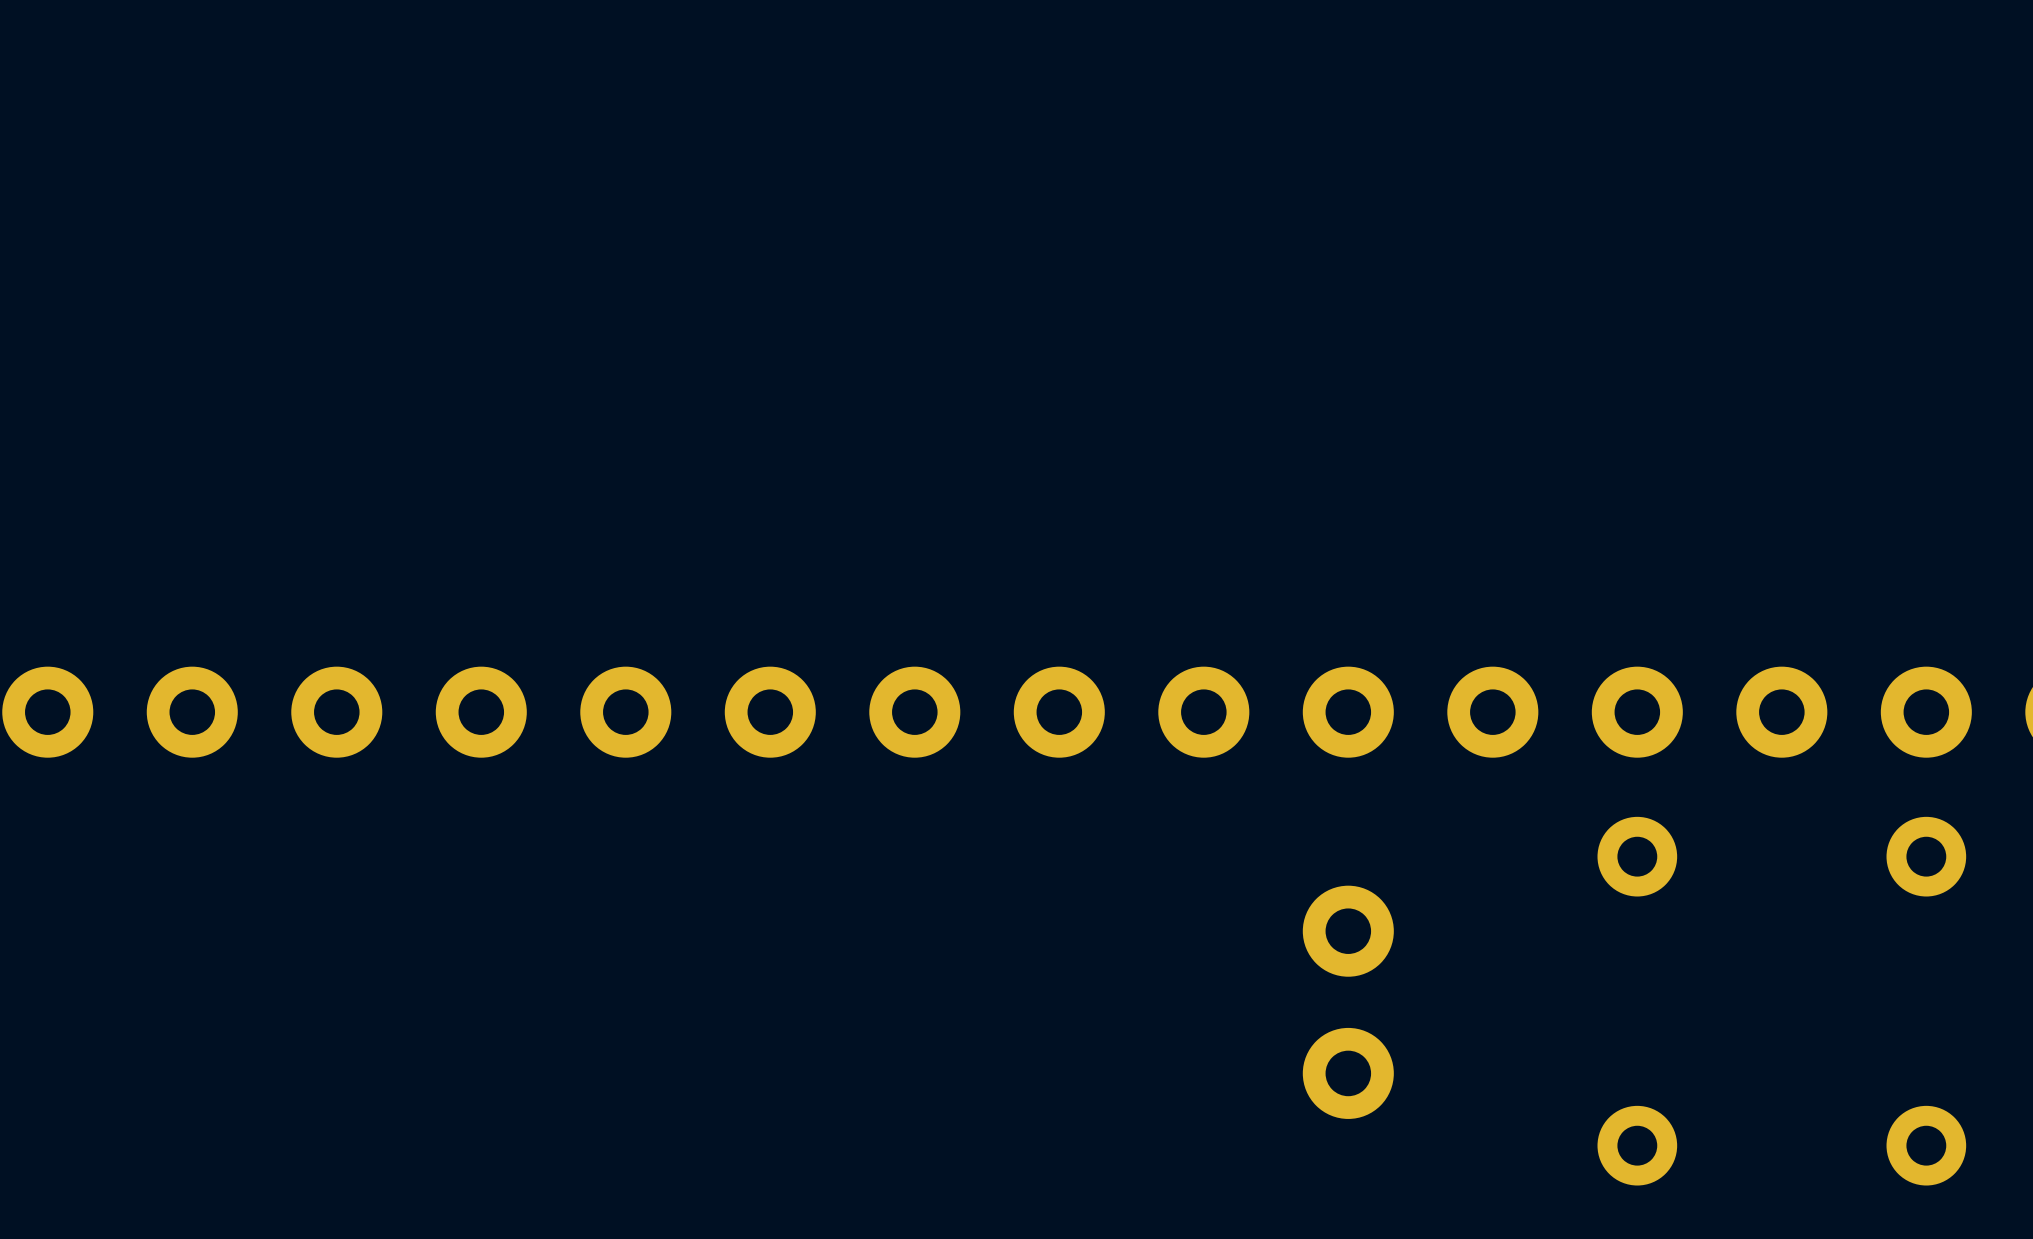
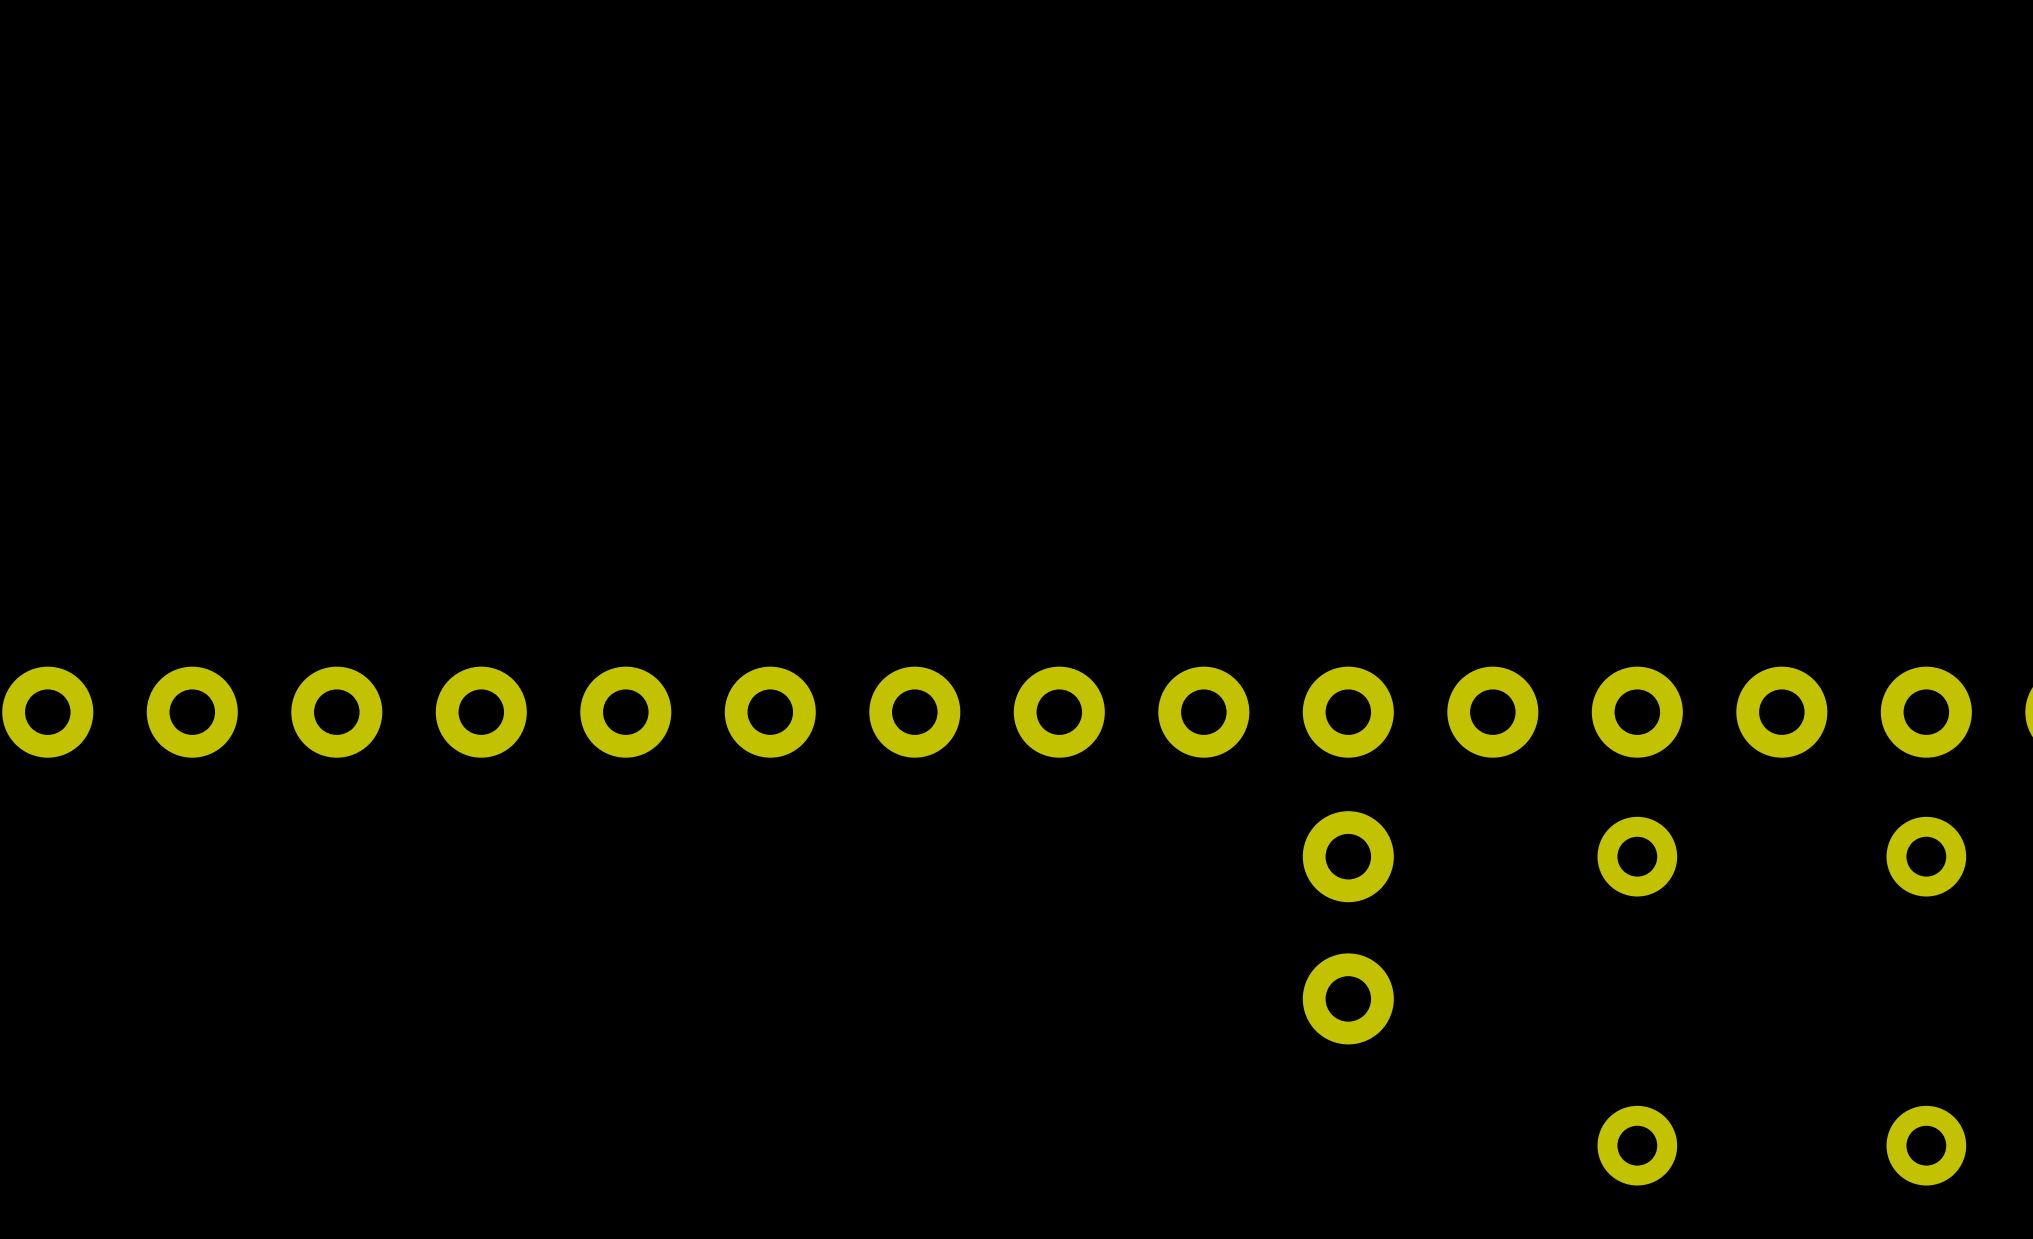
part position: (1348, 1002) -> (1348, 927)

